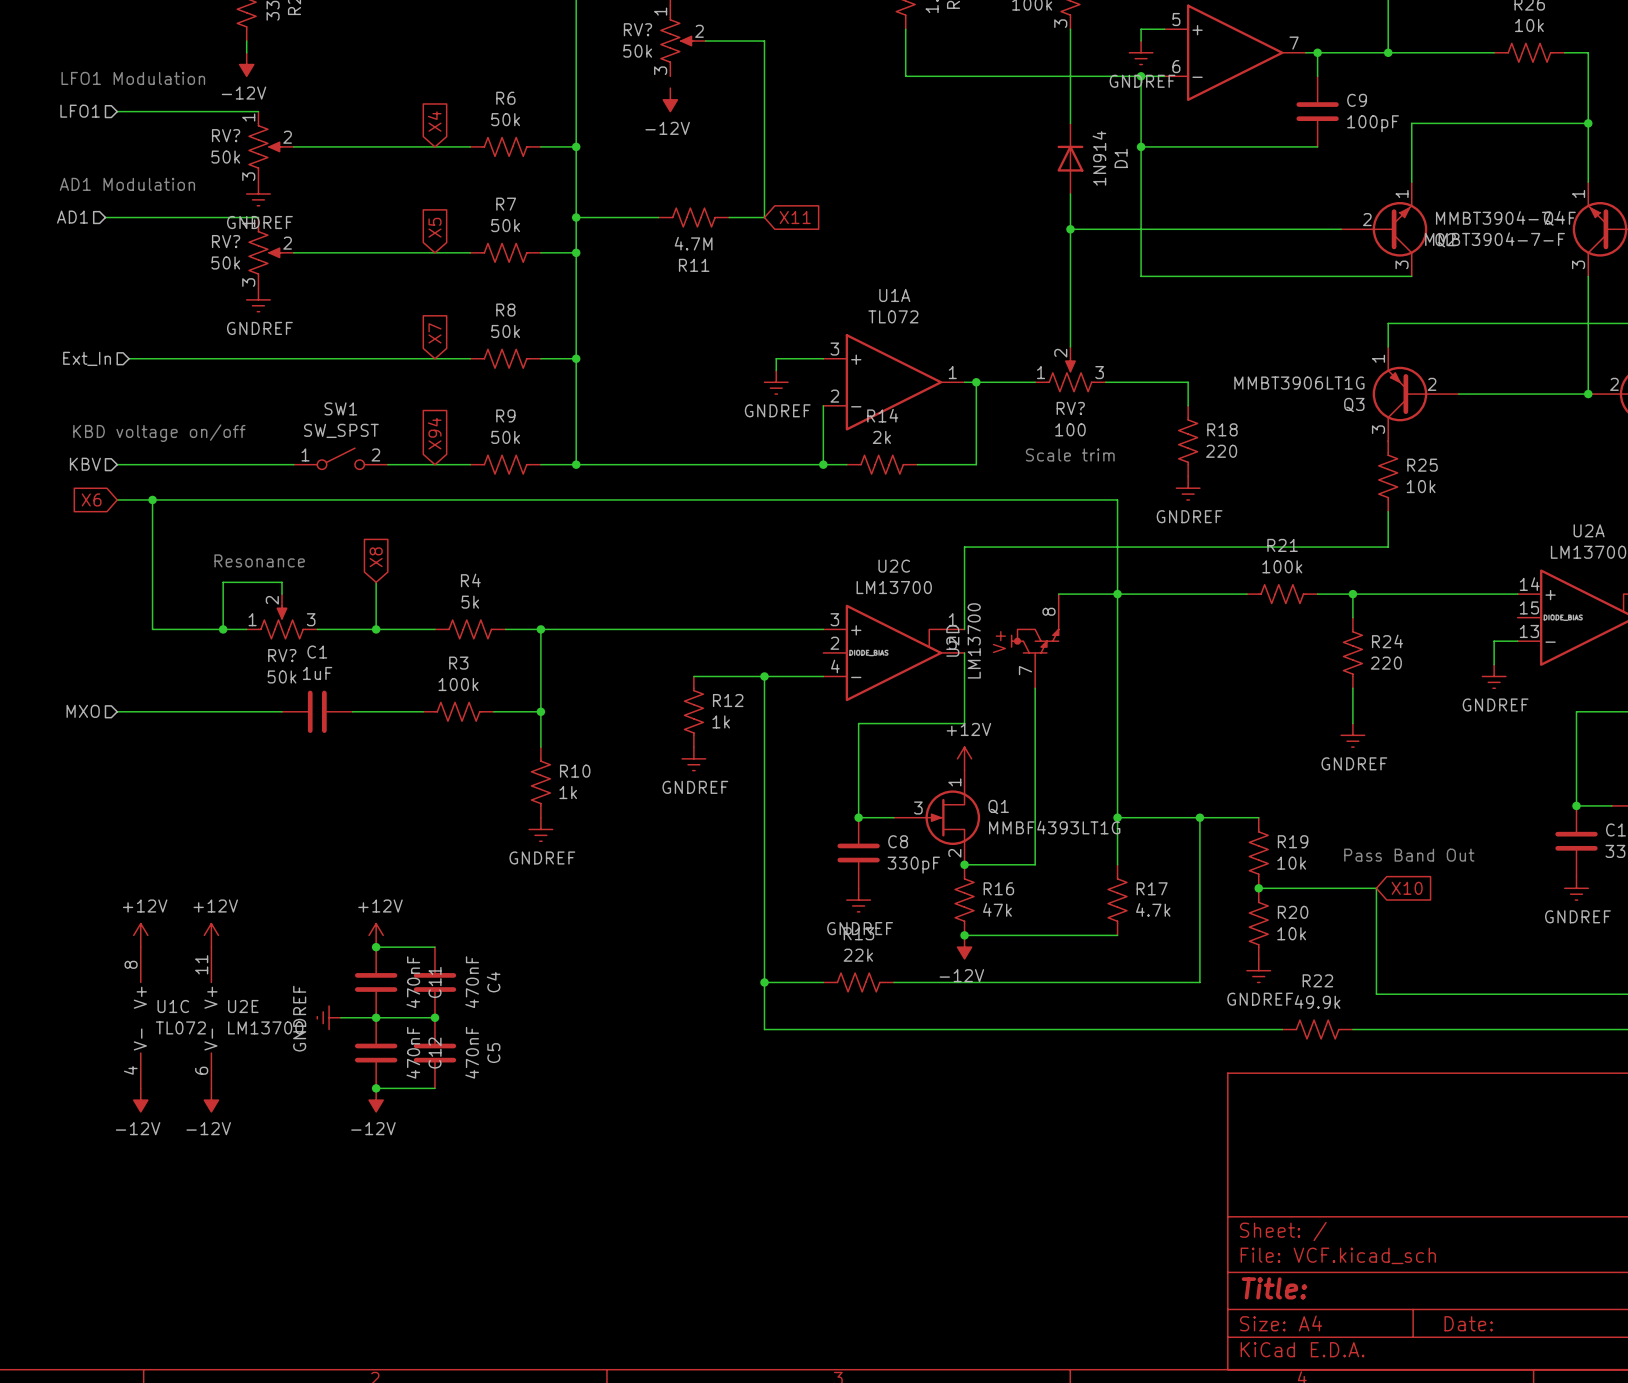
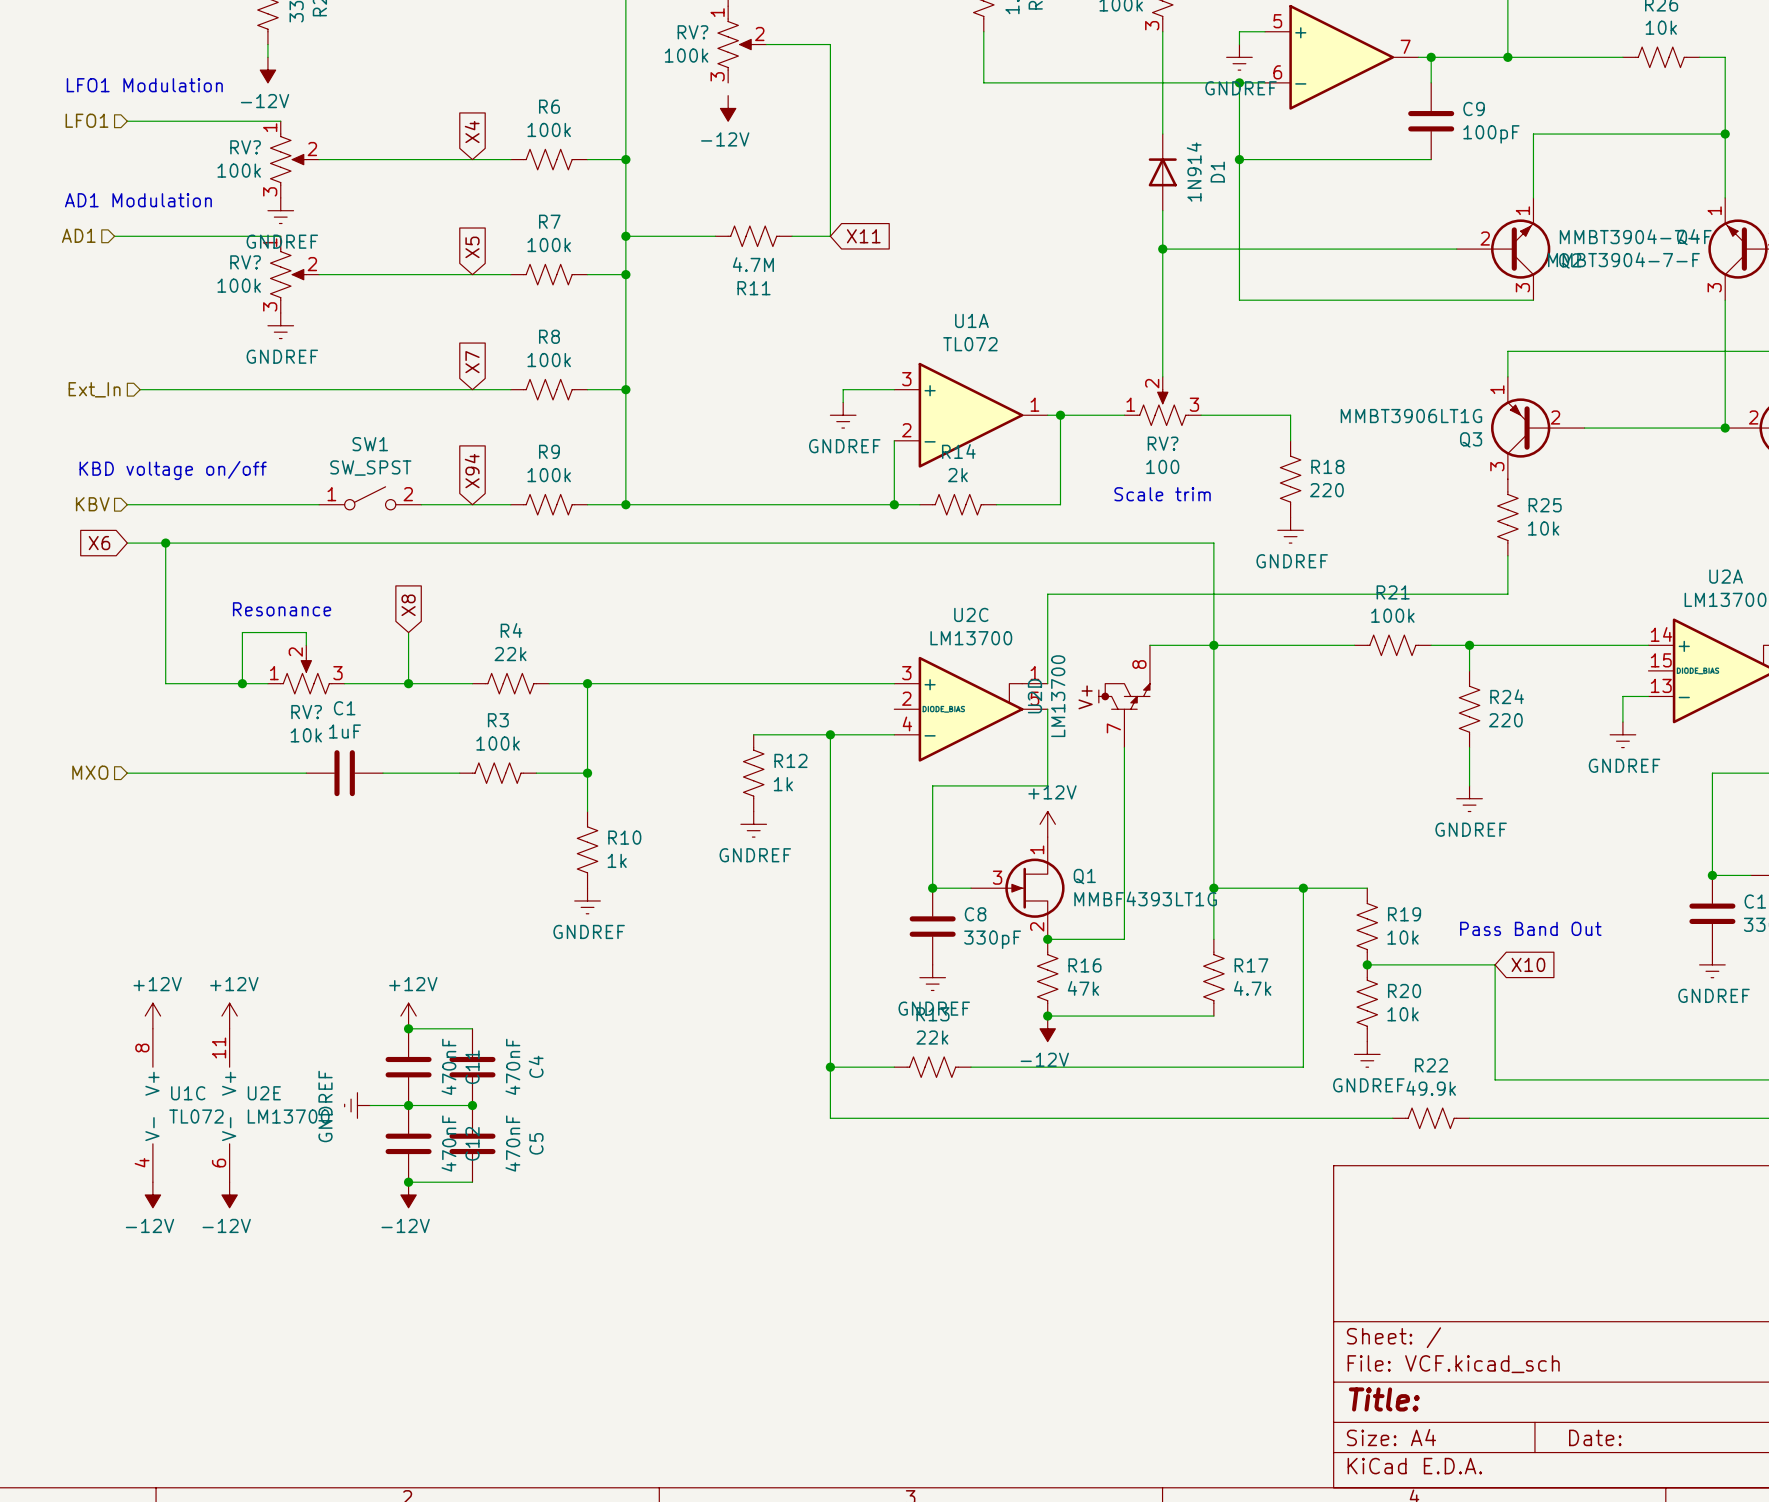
RV? value: 50k (637, 51) -> 100k (686, 55)
R6 value: 50k (505, 119) -> 100k (549, 129)
RV? value: 50k (225, 157) -> 100k (239, 170)
R7 value: 50k (505, 225) -> 100k (549, 245)
RV? value: 50k (225, 262) -> 100k (239, 285)
R8 value: 50k (505, 331) -> 100k (549, 360)
R9 value: 50k (505, 437) -> 100k (549, 475)
R4 value: 5k (470, 602) -> 22k (510, 654)
RV? value: 50k (282, 676) -> 10k (306, 735)

